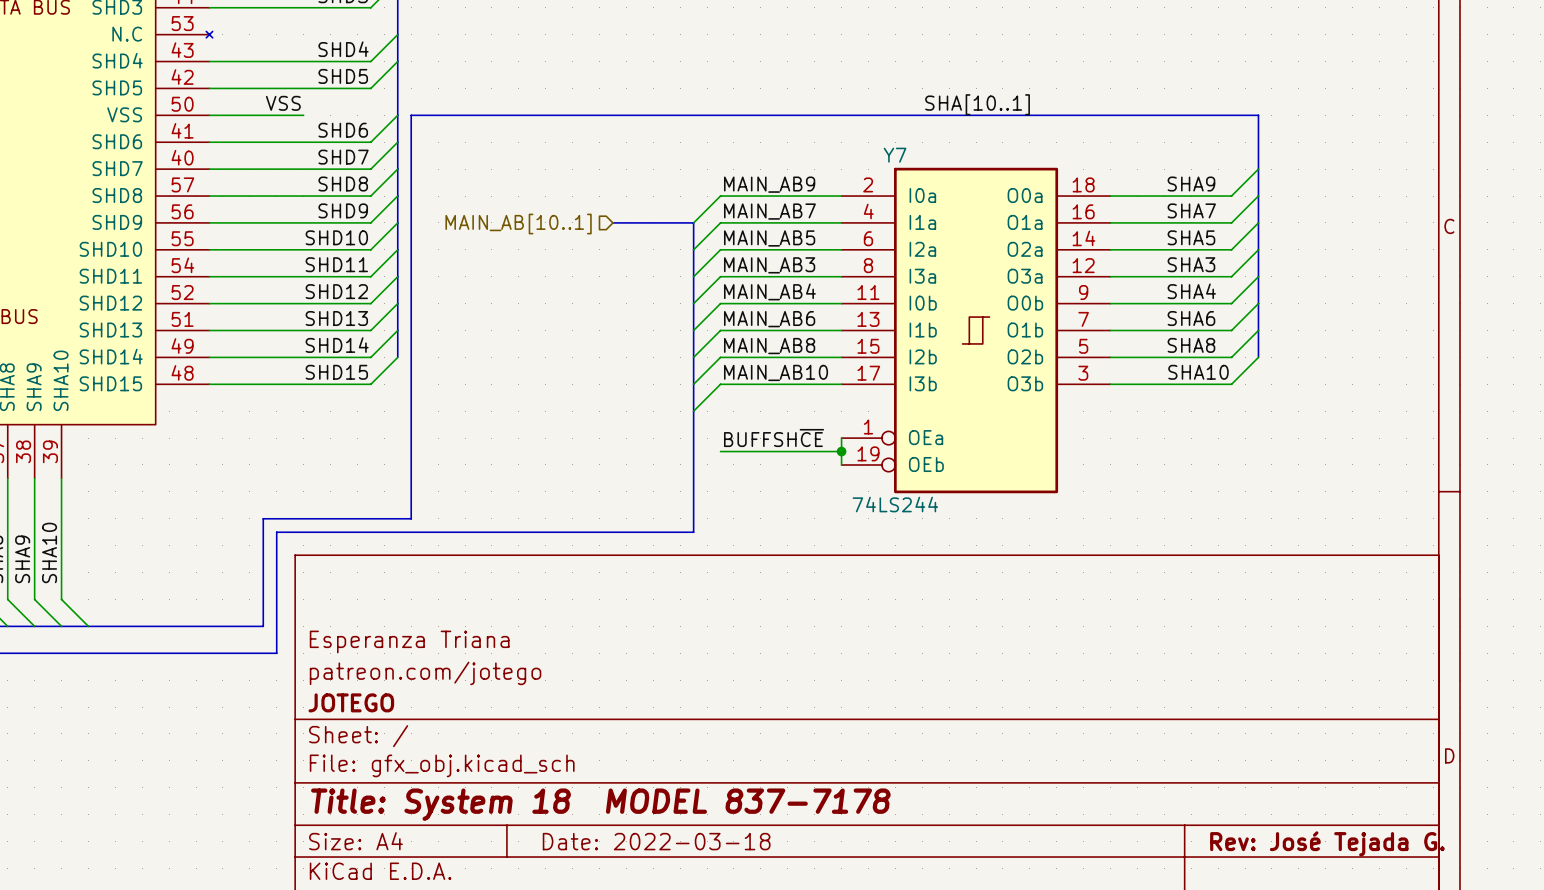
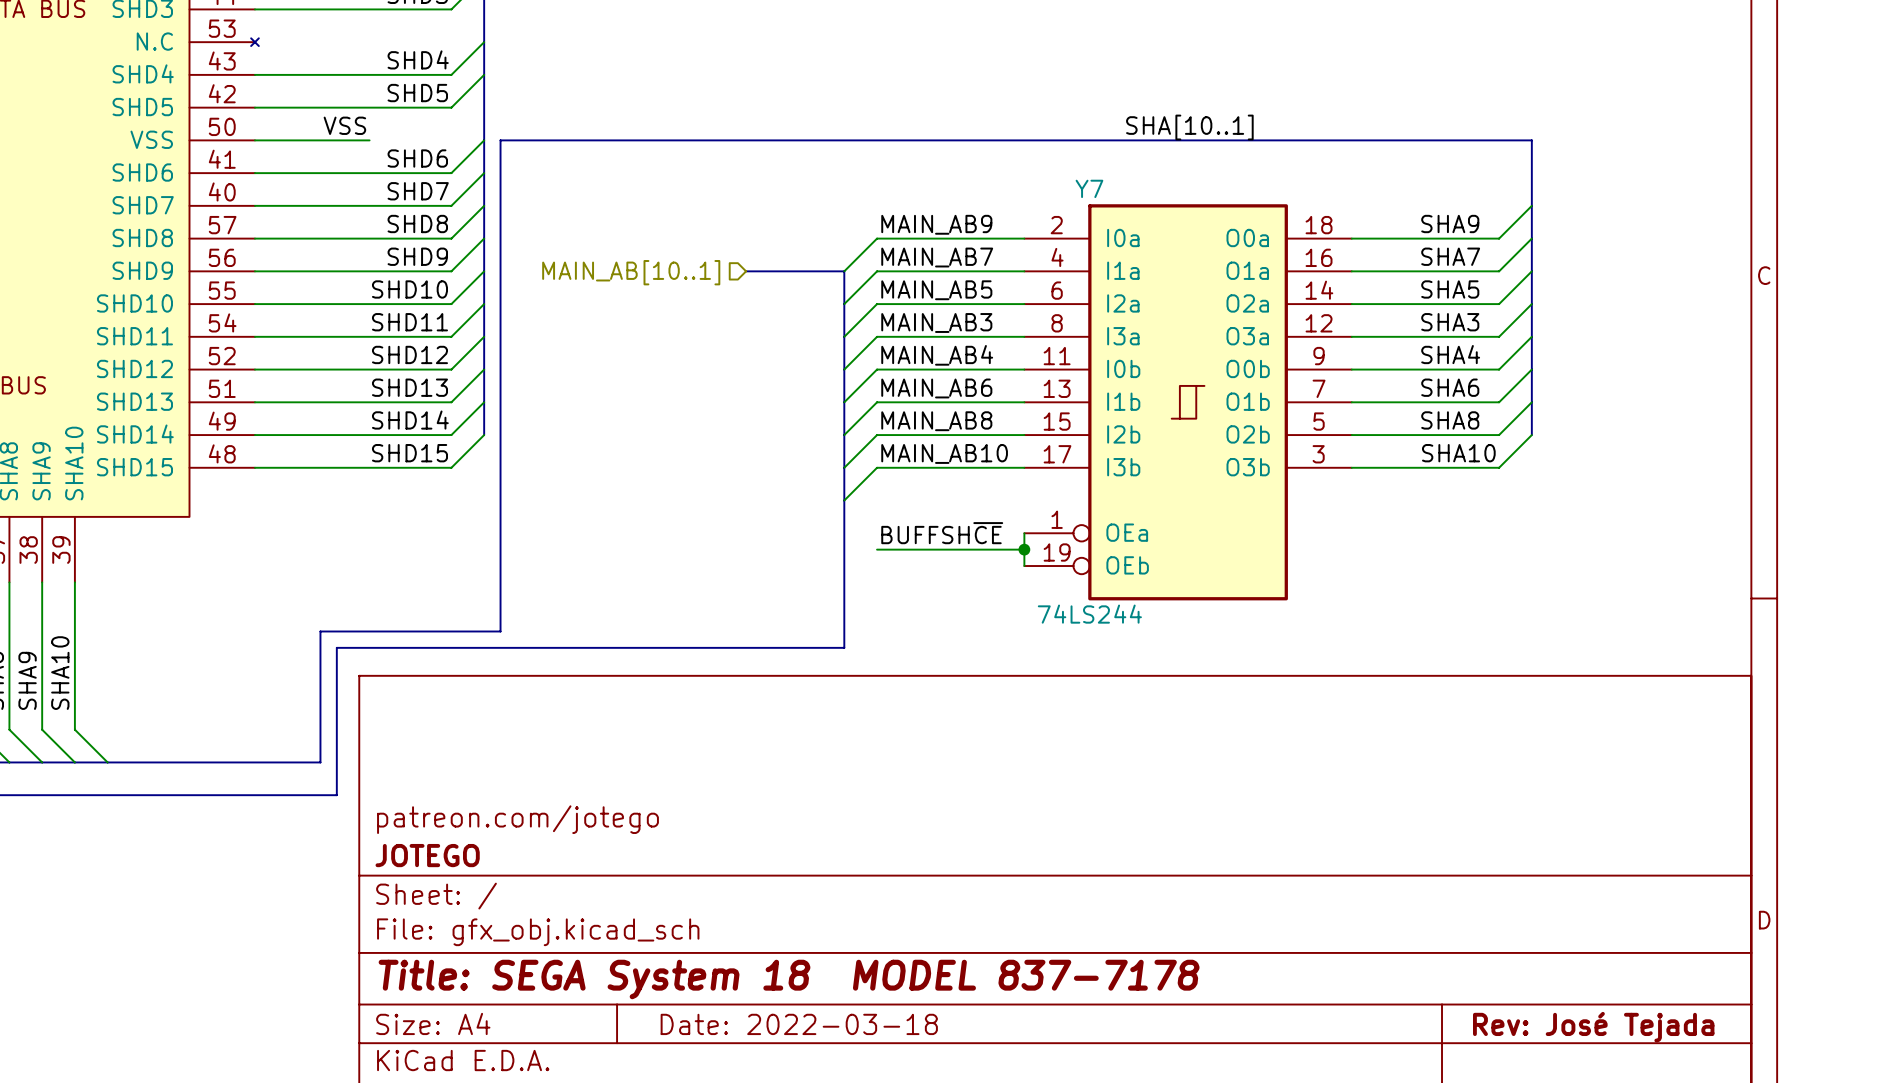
title block: Esperanza Triana (409, 641) -> none
title block: Title: System 18 MODEL 837-7178 (600, 804) -> Title: SEGA System 18 MODEL 837-7178 (789, 979)
title block: Rev: José Tejada G. (1327, 843) -> Rev: José Tejada (1593, 1027)

